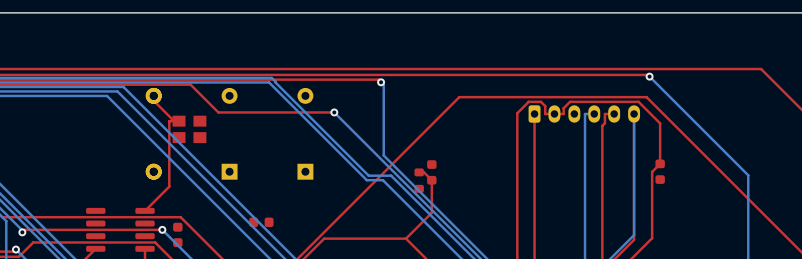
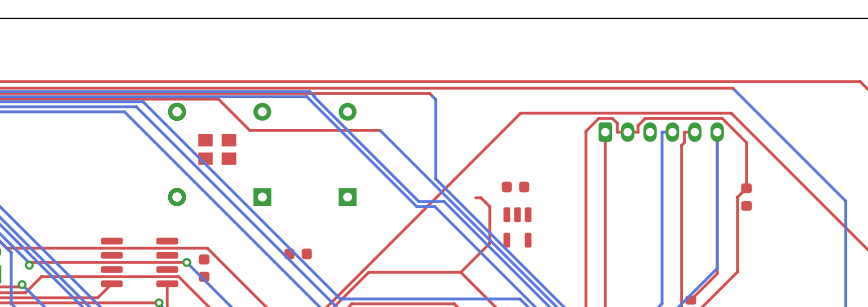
via: (649, 76) -> none
via: (381, 82) -> none
top track: (153, 95) (153, 100) (174, 121) -> none
via: (334, 112) -> none
top track: (179, 121) (169, 121) (169, 186) (145, 210) -> none
part: none -> (515, 187)
part: (431, 172) -> none
part: (419, 180) -> none
part: none -> (517, 227)

